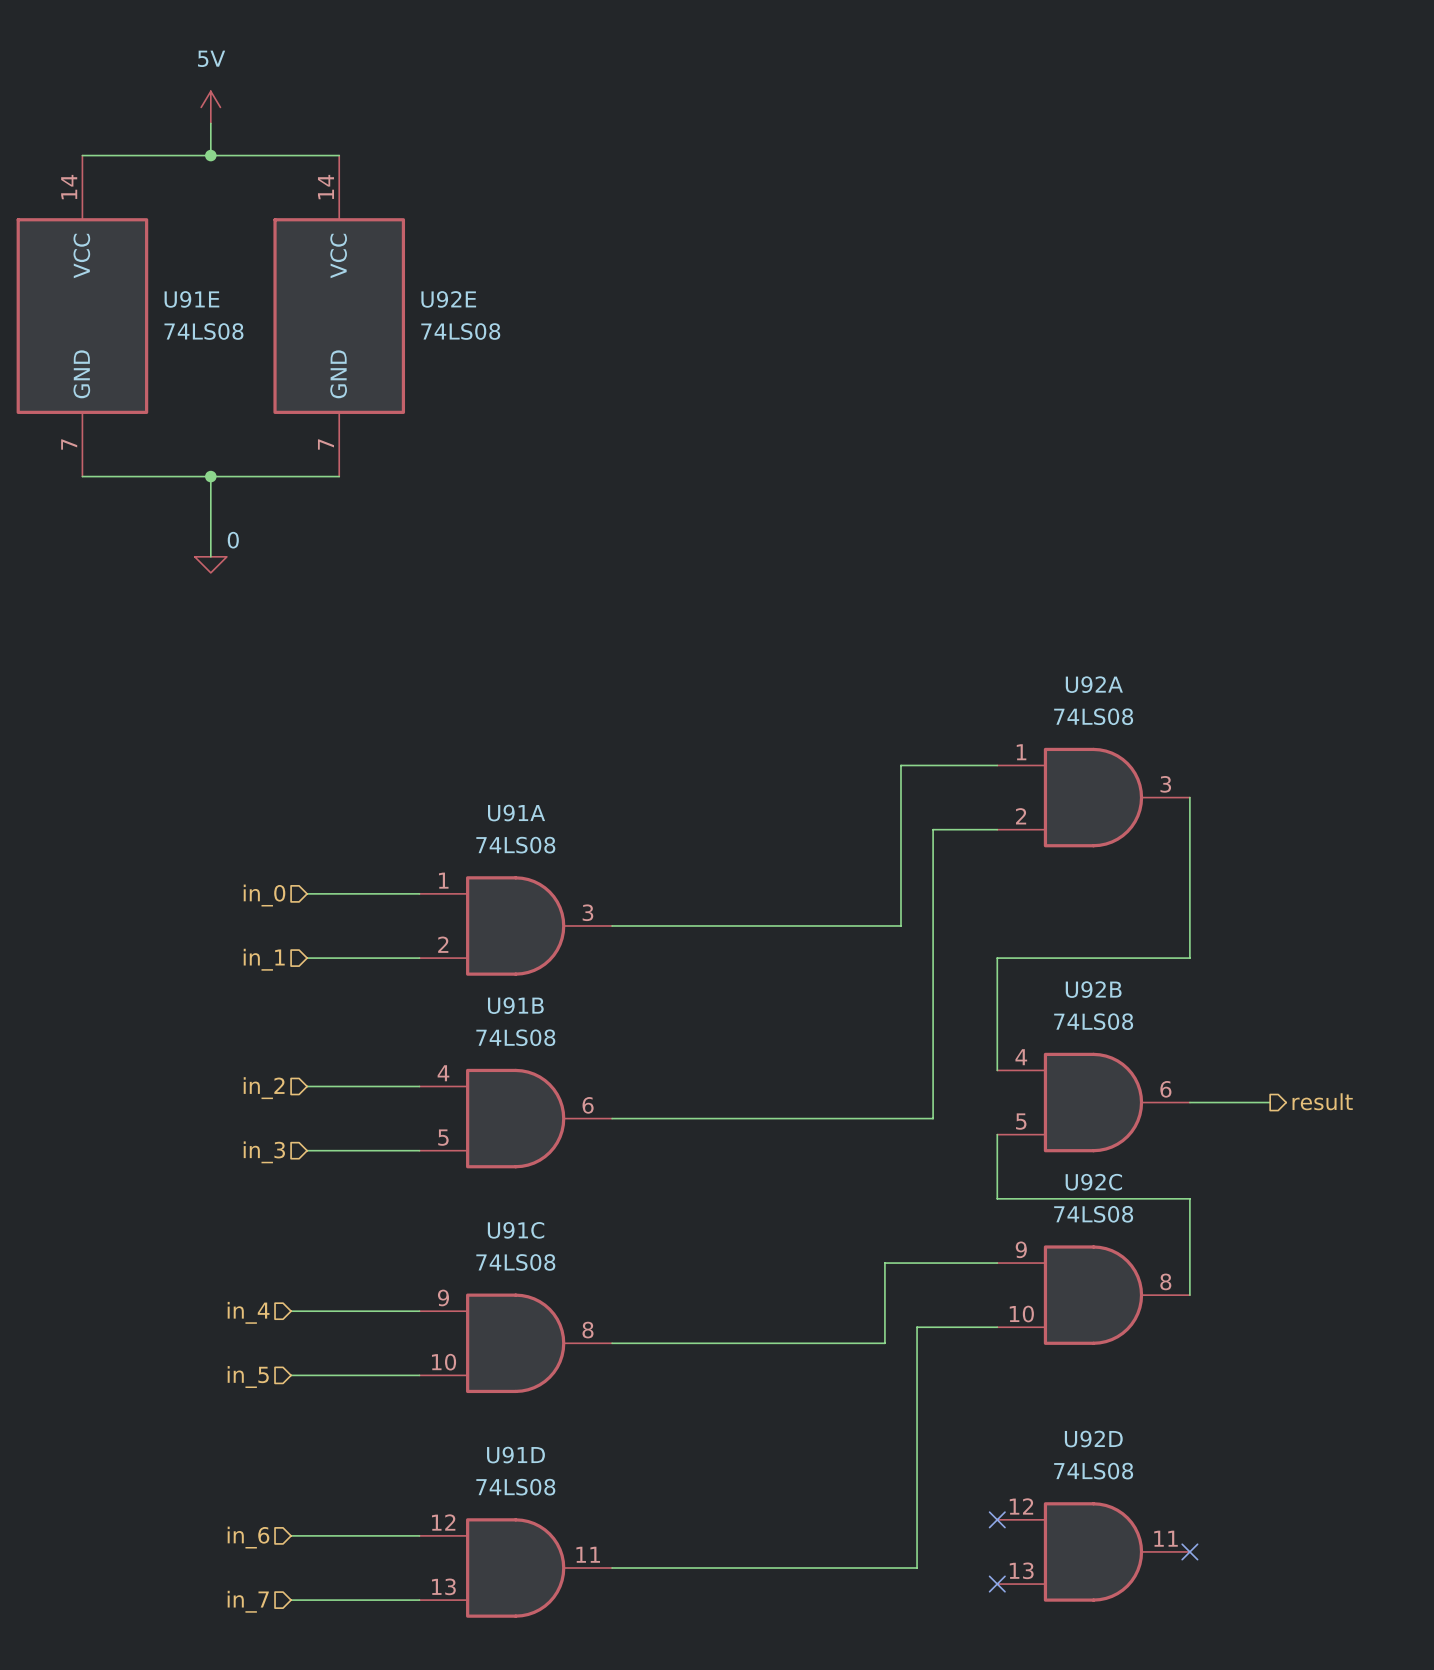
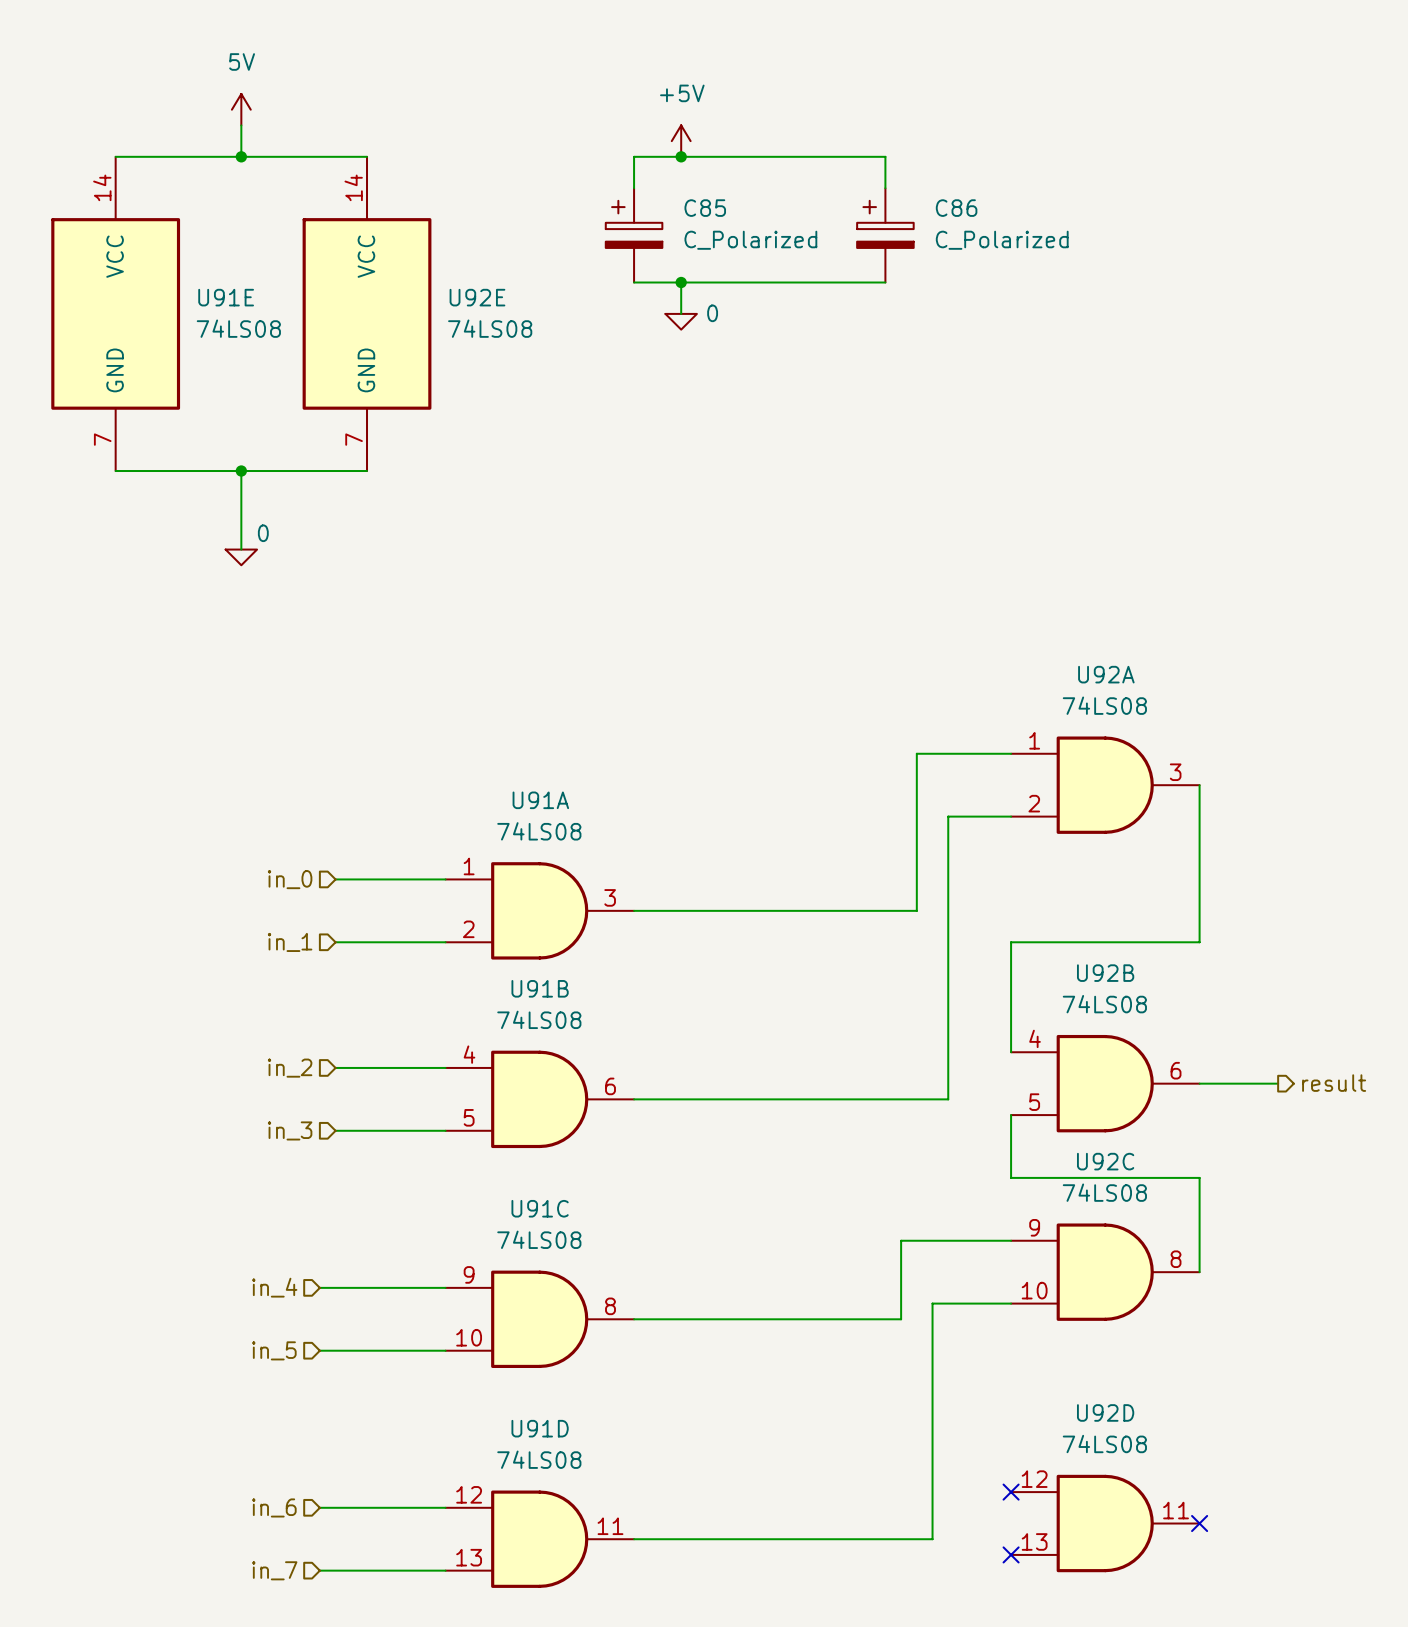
power symbol: none -> +5V (681, 141)
junction: none -> (681, 156)
wire: none -> (634, 188) (634, 156) (885, 156) (885, 188)
C85: none -> C_Polarized (634, 235)
C86: none -> C_Polarized (885, 235)
wire: none -> (634, 282) (885, 282)
wire: none -> (681, 282) (681, 313)
junction: none -> (681, 282)
power symbol: none -> 0 (681, 321)

